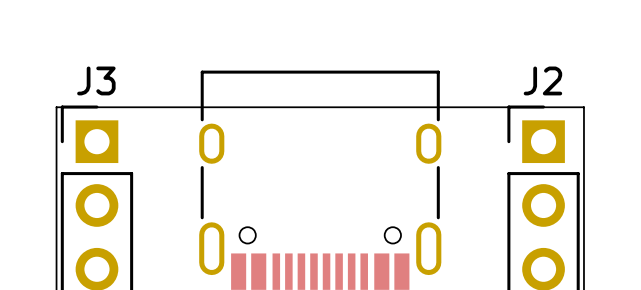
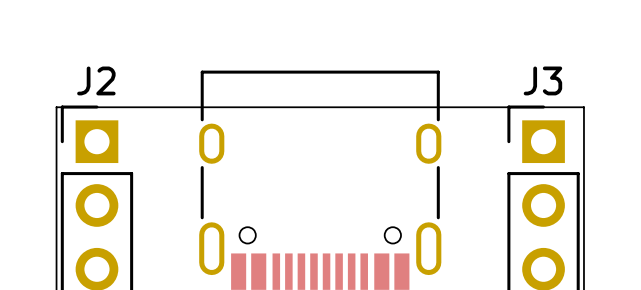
J3 name: J3 (96, 80) -> J2 (96, 80)
J2 name: J2 (542, 80) -> J3 (542, 80)

